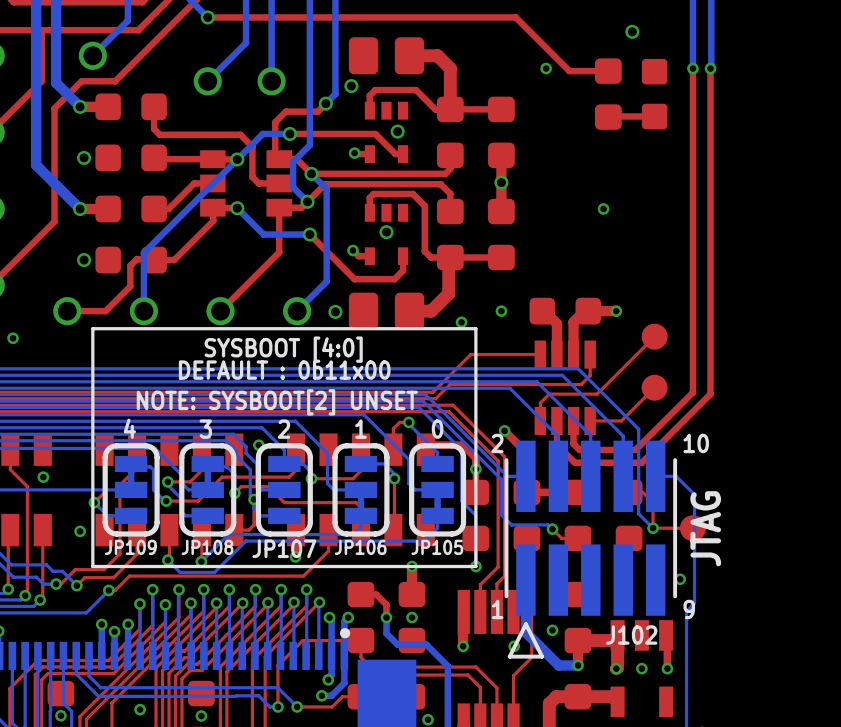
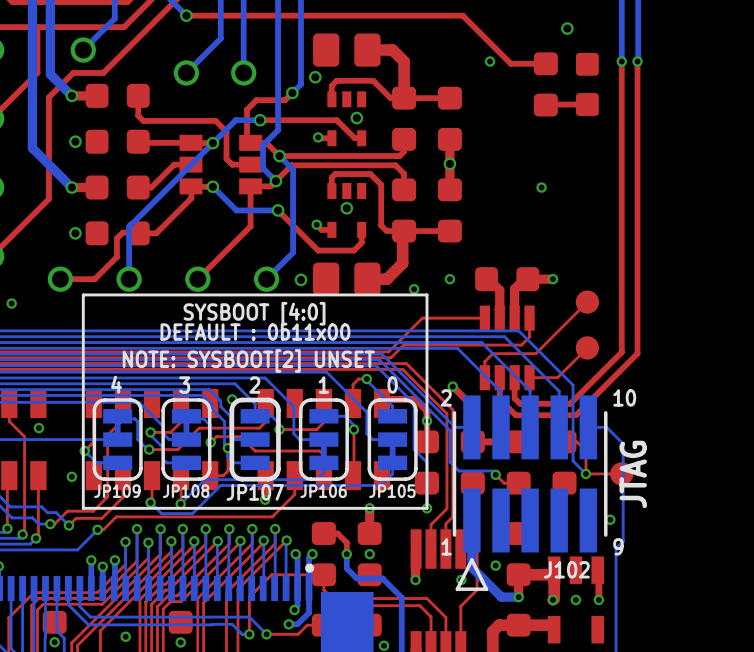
JP109 footprint: [102, 443, 160, 537] -> [92, 398, 143, 481]
JP108 footprint: [179, 443, 237, 537] -> [161, 398, 212, 481]
JP106 footprint: [332, 443, 390, 537] -> [298, 398, 349, 481]
JP105 footprint: [409, 443, 467, 537] -> [367, 398, 418, 481]

